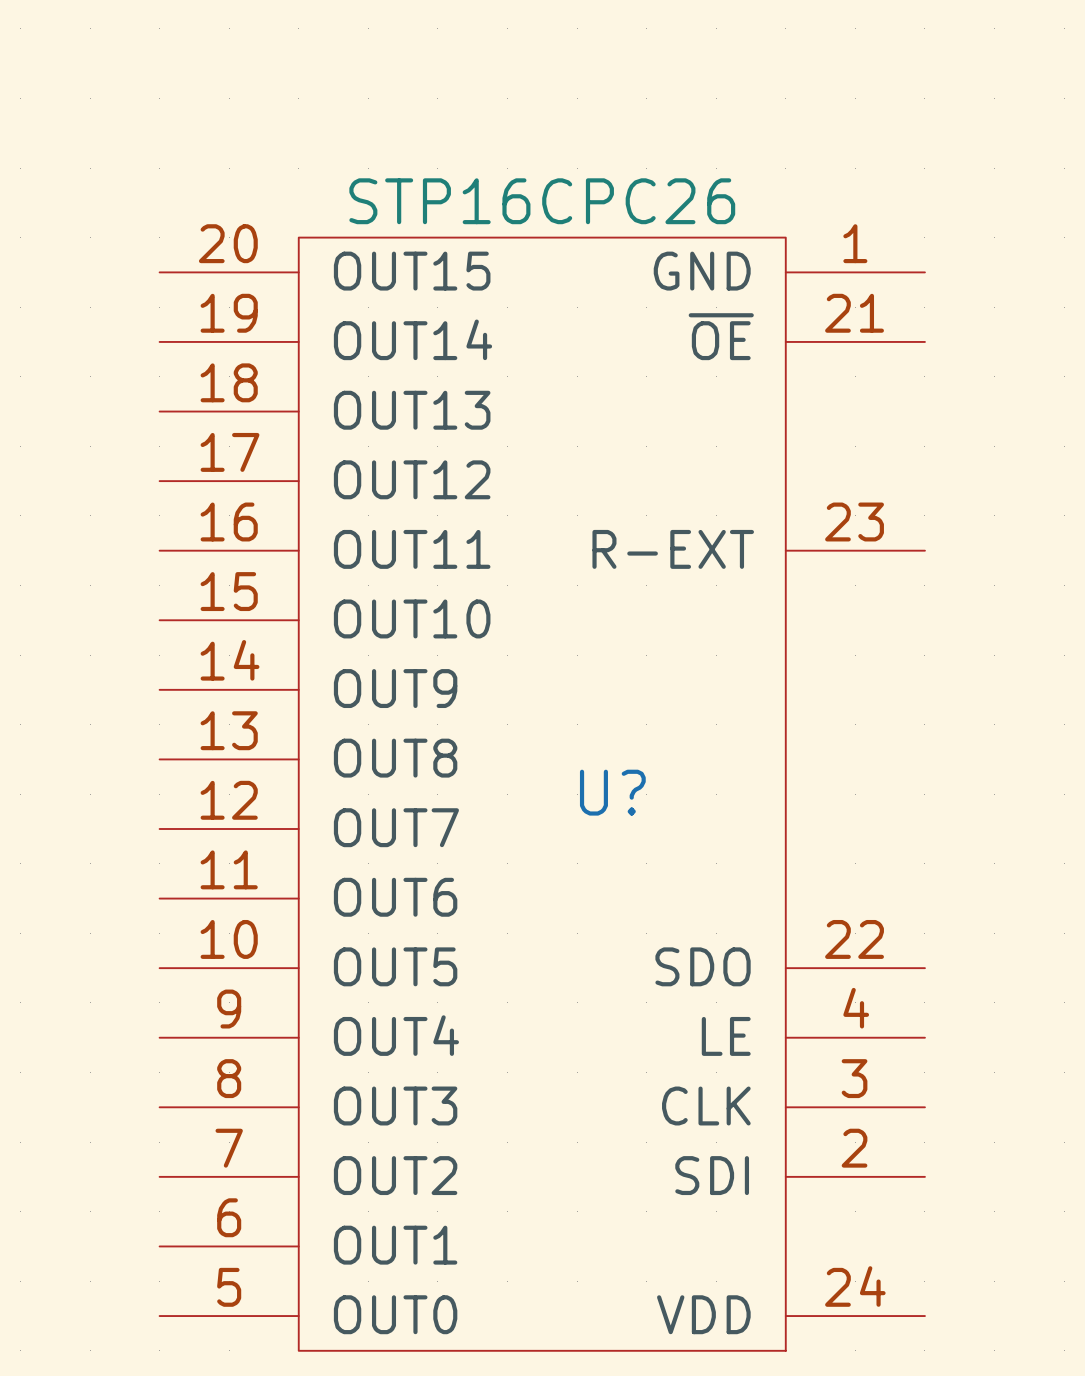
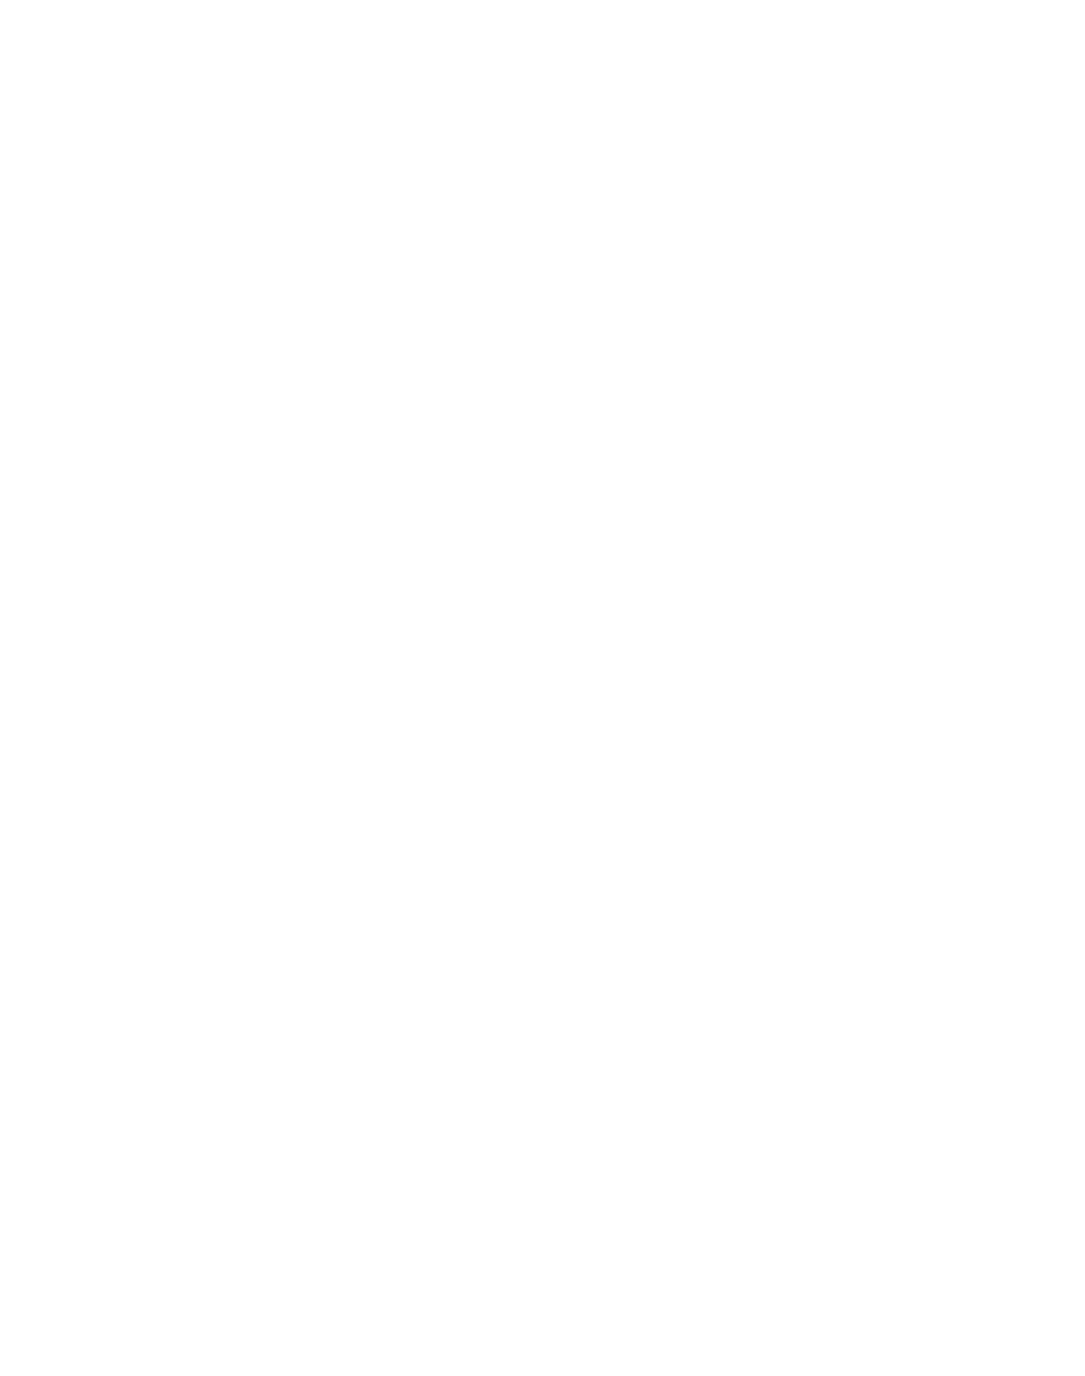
U?: STP16CPC26 (542, 794) -> none

